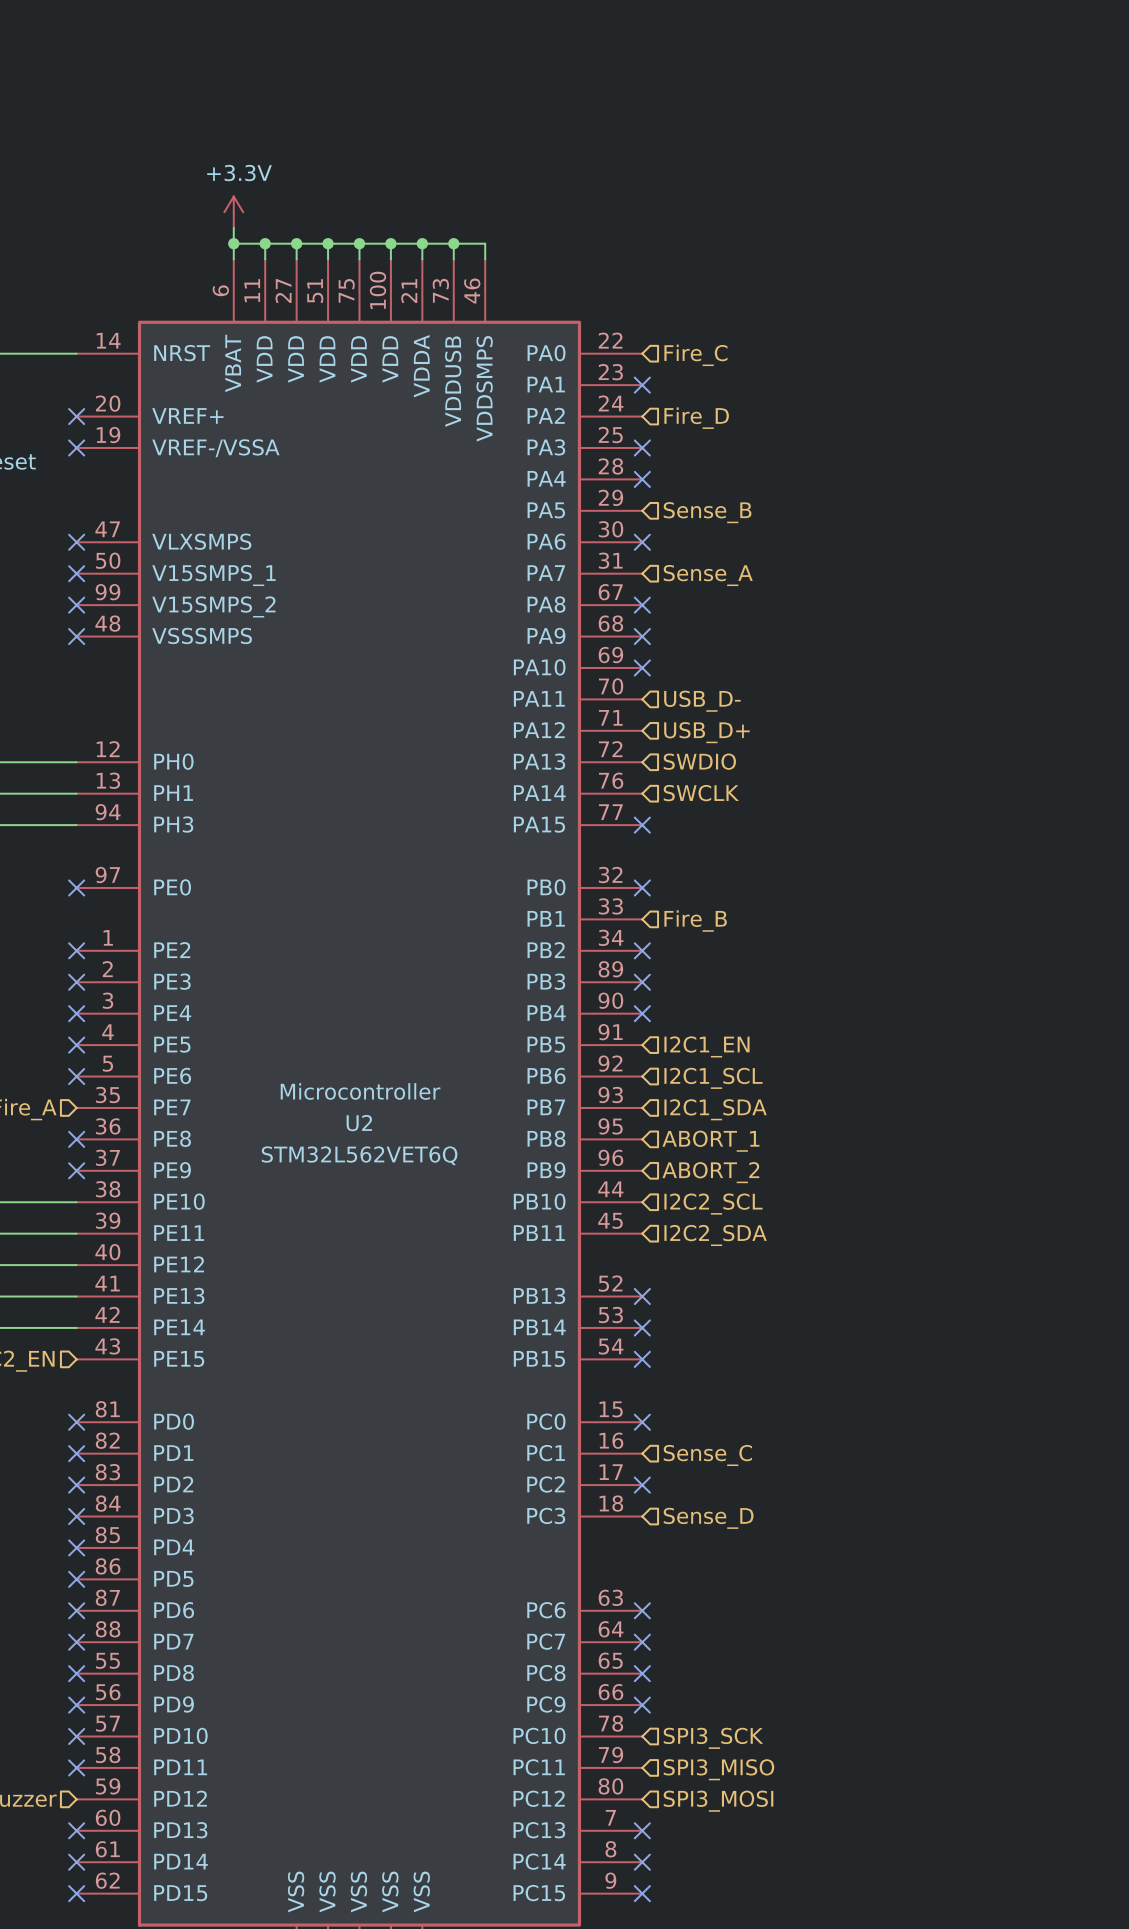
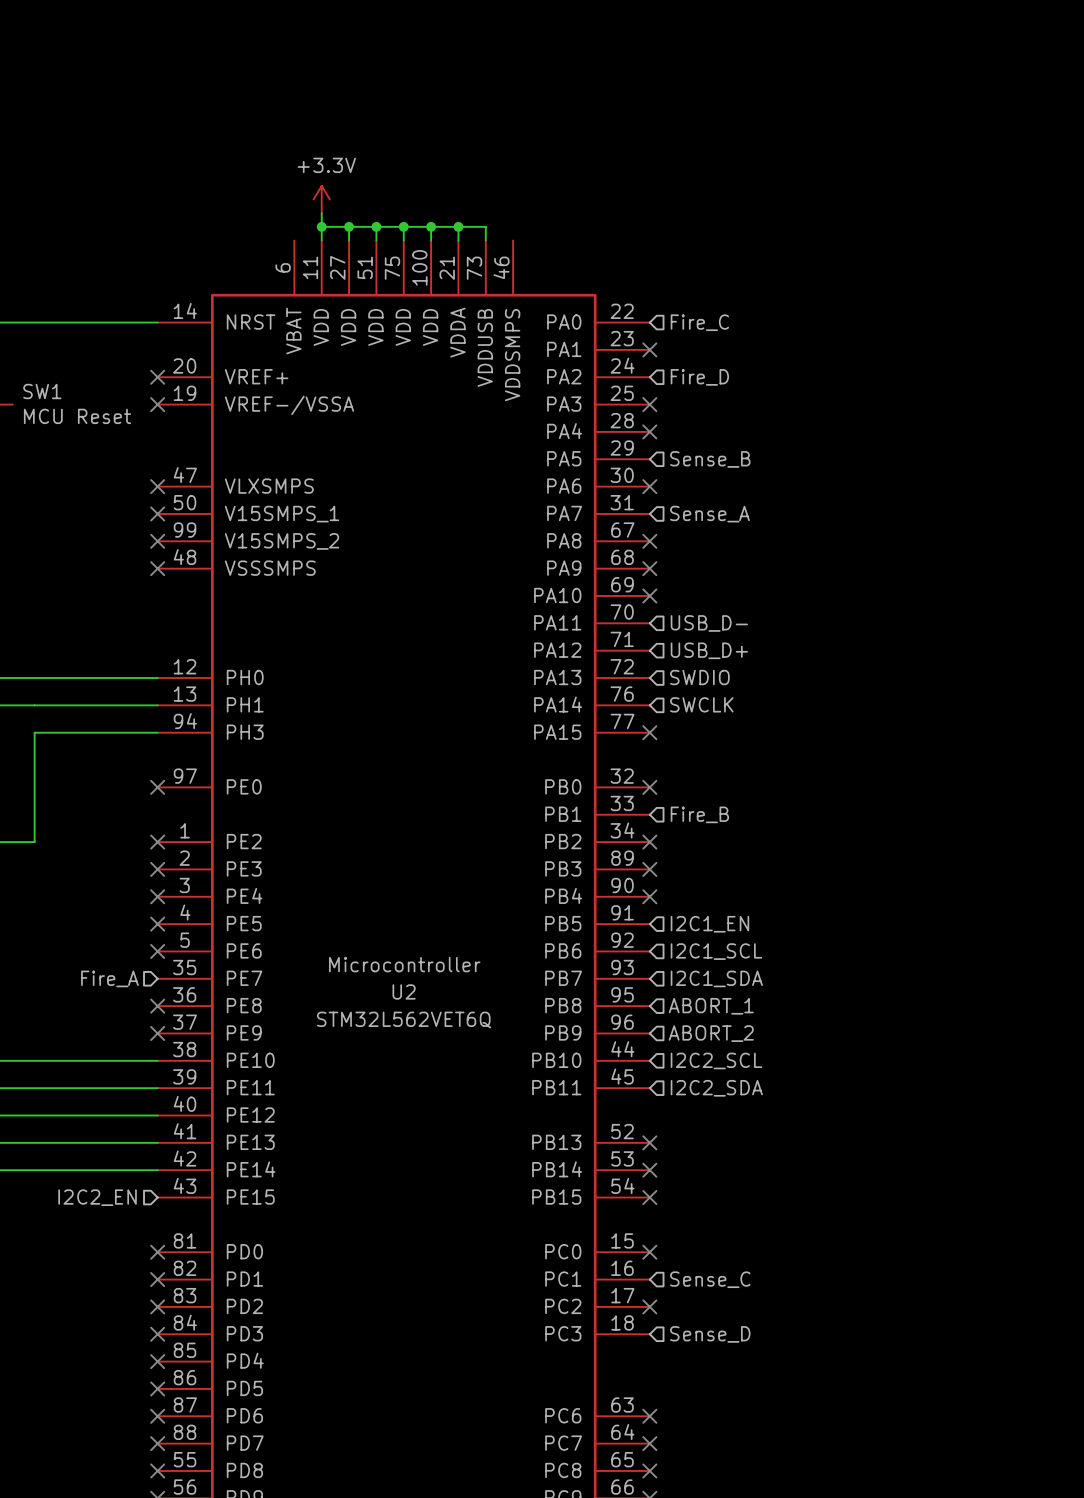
power symbol position: +3.3V (233, 212) -> +3.3V (321, 199)
wire: (233, 227) (233, 259) -> none
wire: (233, 243) (265, 243) -> (321, 213) (321, 226)
junction: (233, 243) -> none
wire: (453, 243) (485, 243) (485, 259) -> none
junction: (453, 243) -> none

